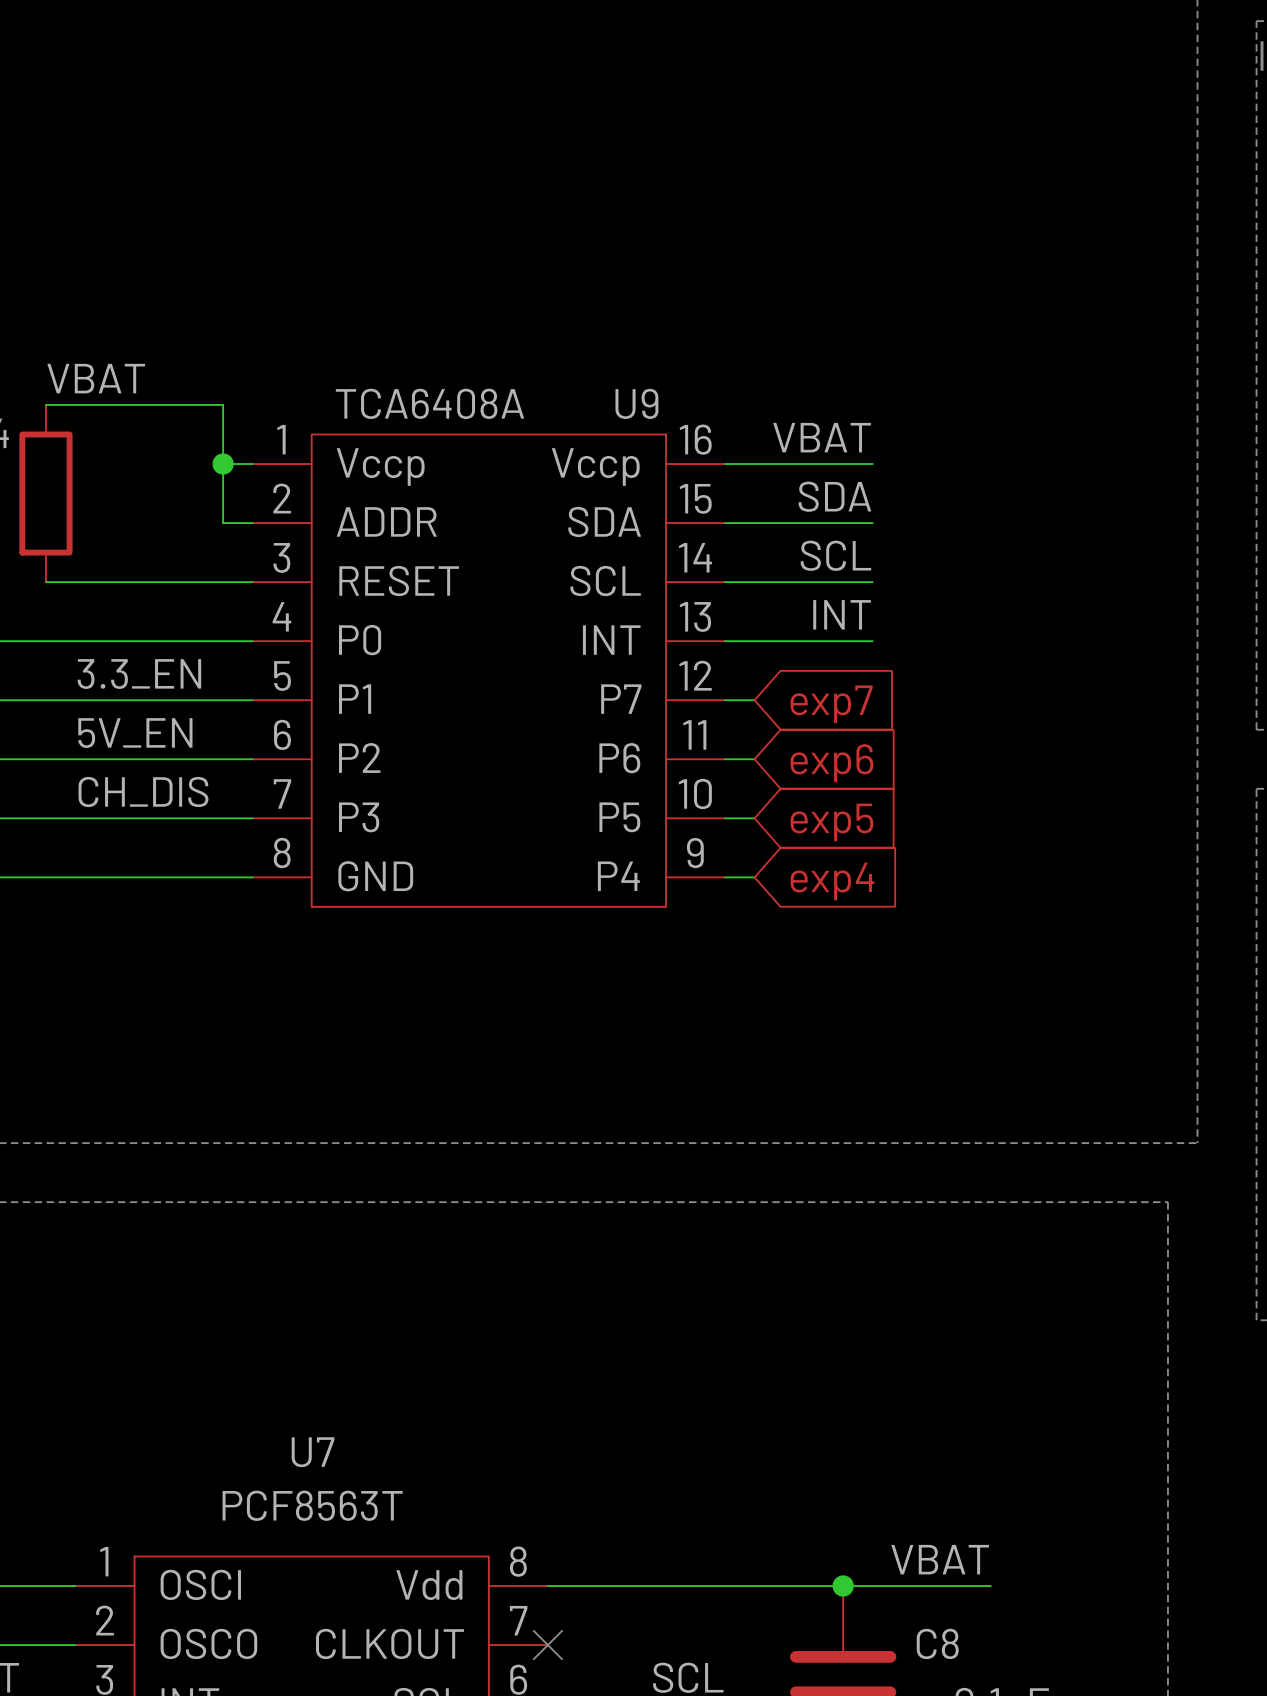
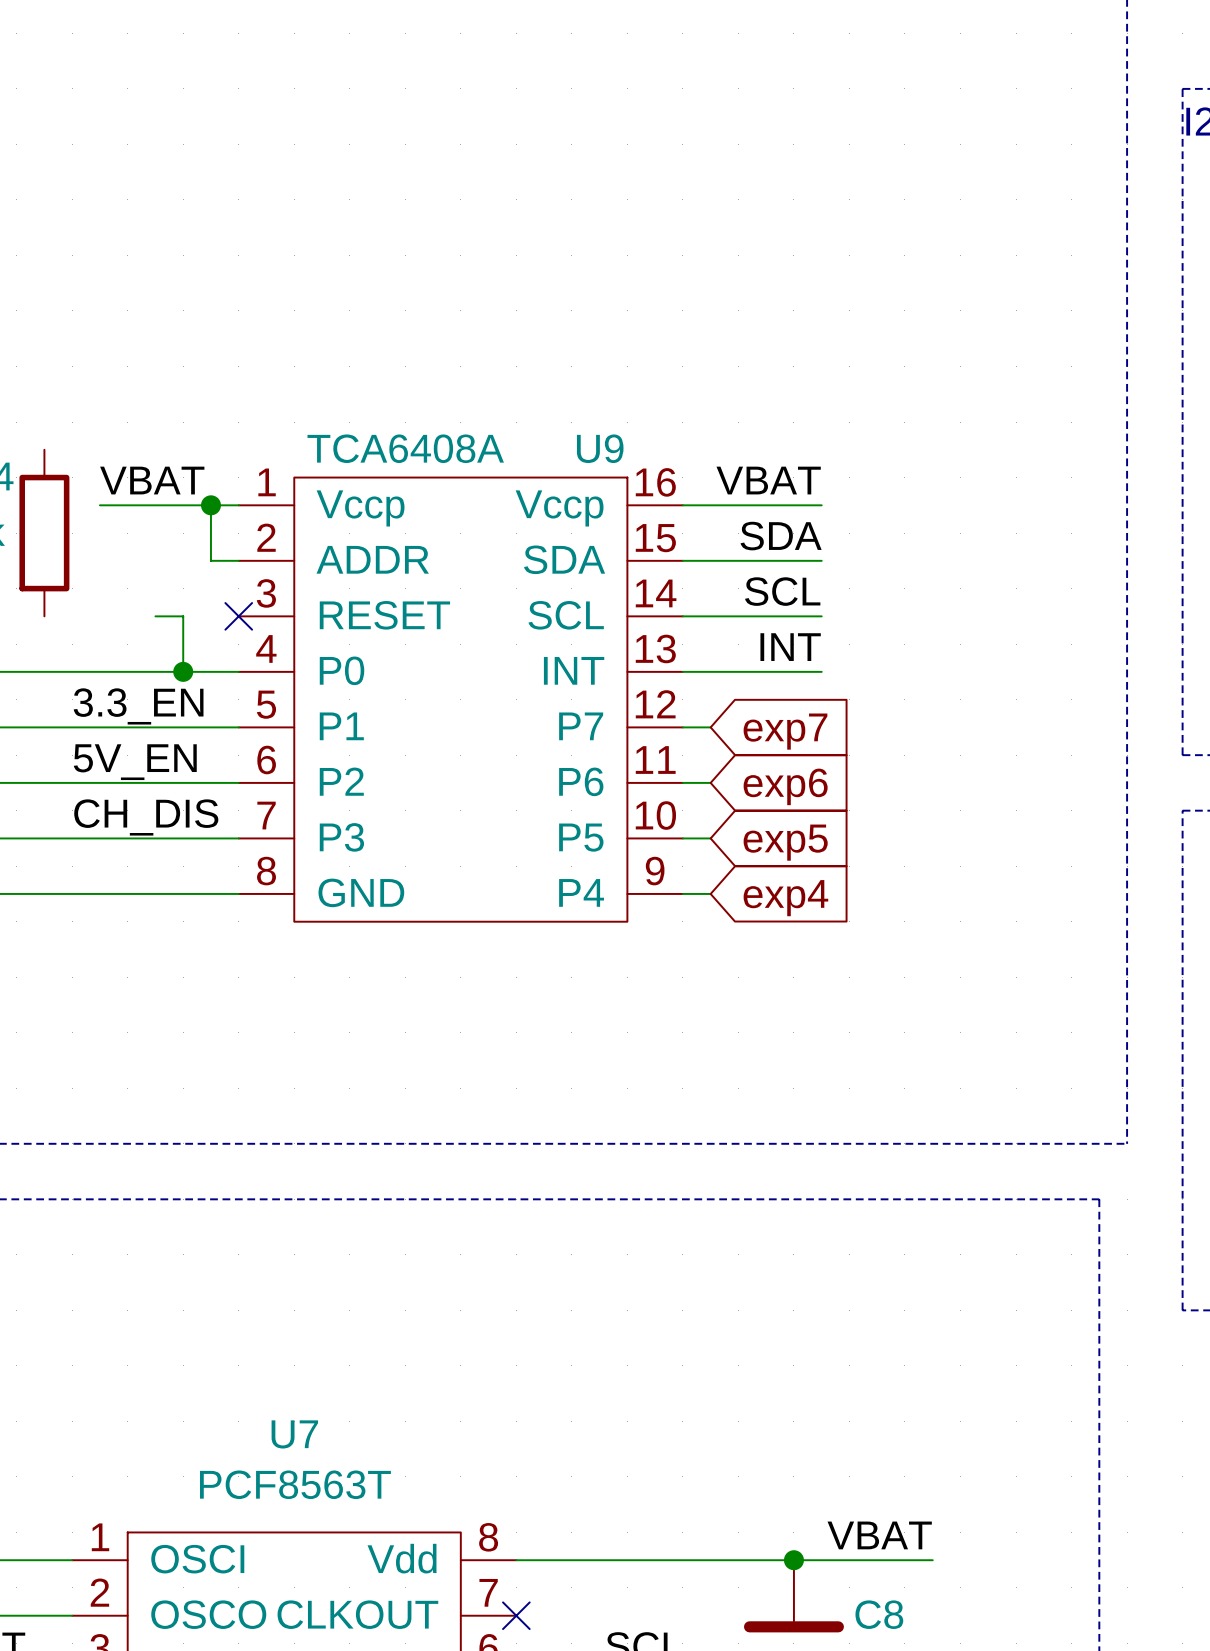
label position: VBAT (96, 378) -> VBAT (152, 480)
wire: (45, 404) (223, 404) (223, 464) -> (99, 505) (210, 505)
wire: (45, 582) (164, 582) -> none
wire: (193, 582) (252, 582) -> (183, 616) (183, 671)
no-connect mark: none -> (238, 616)
junction: none -> (183, 671)

